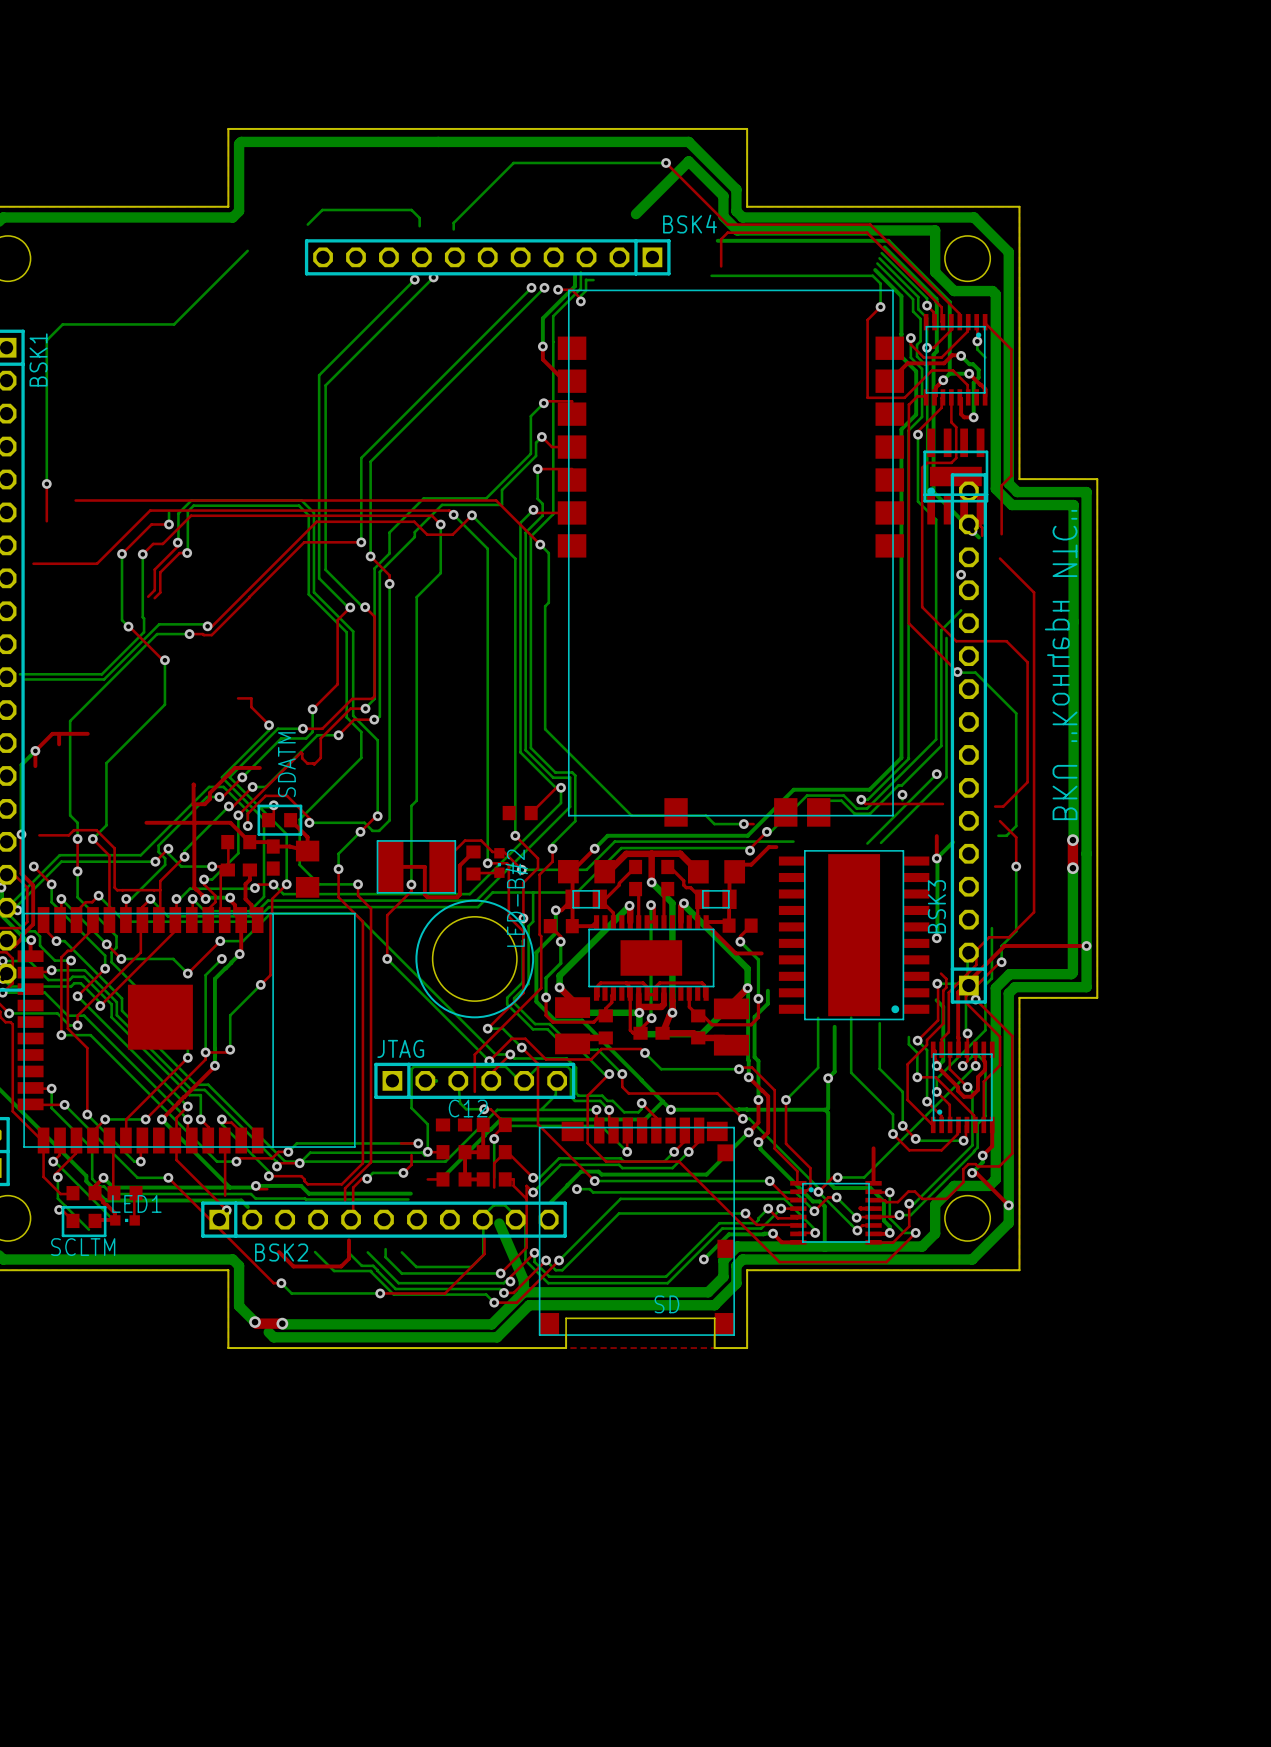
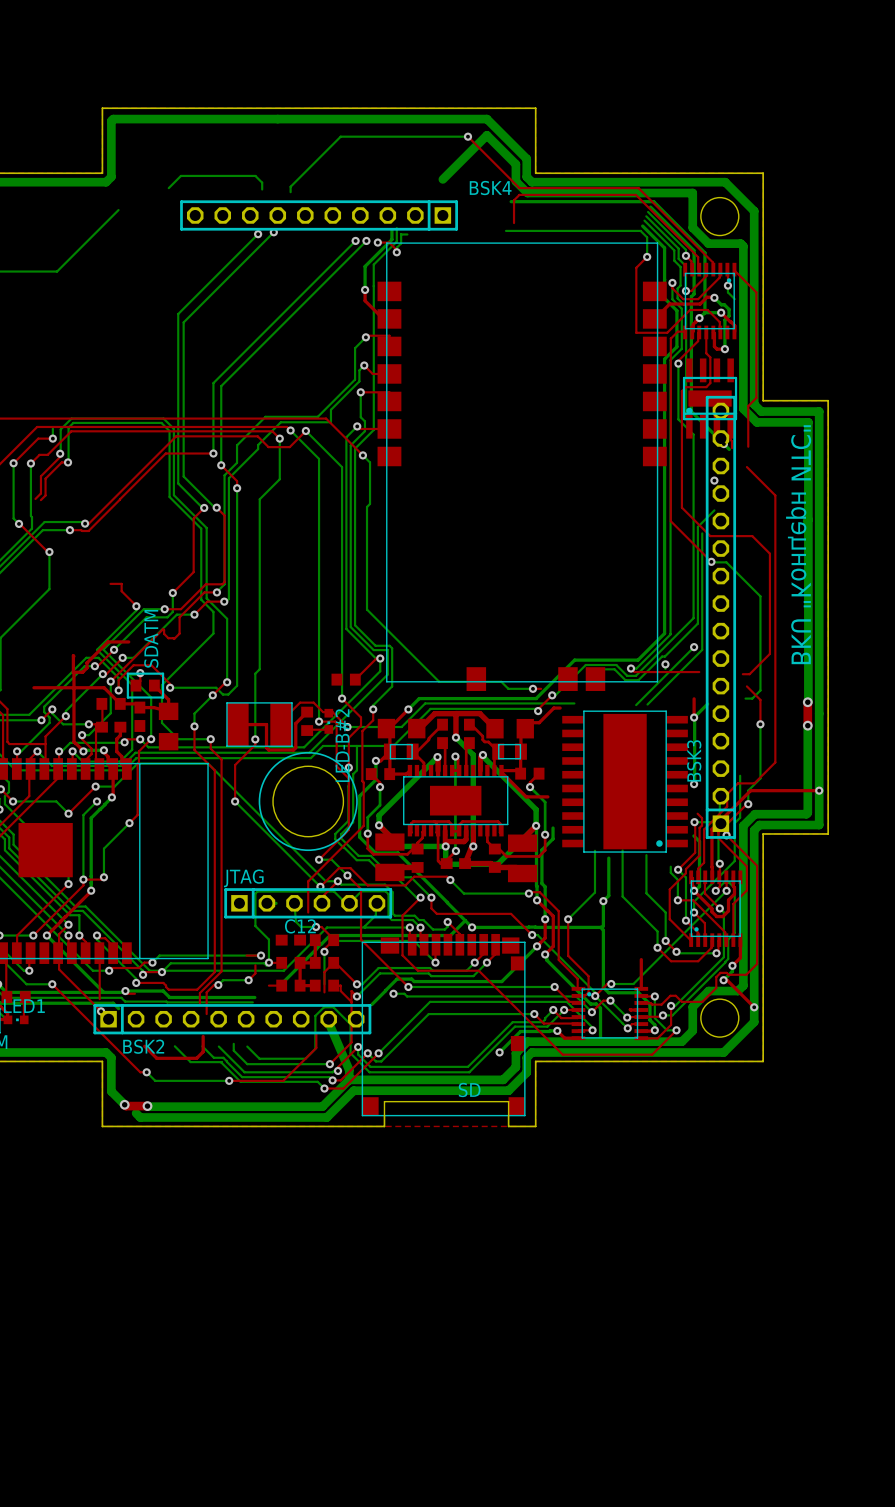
BSK4 footprint: [304, 239, 671, 276] -> [180, 200, 458, 231]
BSK2 footprint: [201, 1201, 567, 1238] -> [93, 1004, 372, 1035]

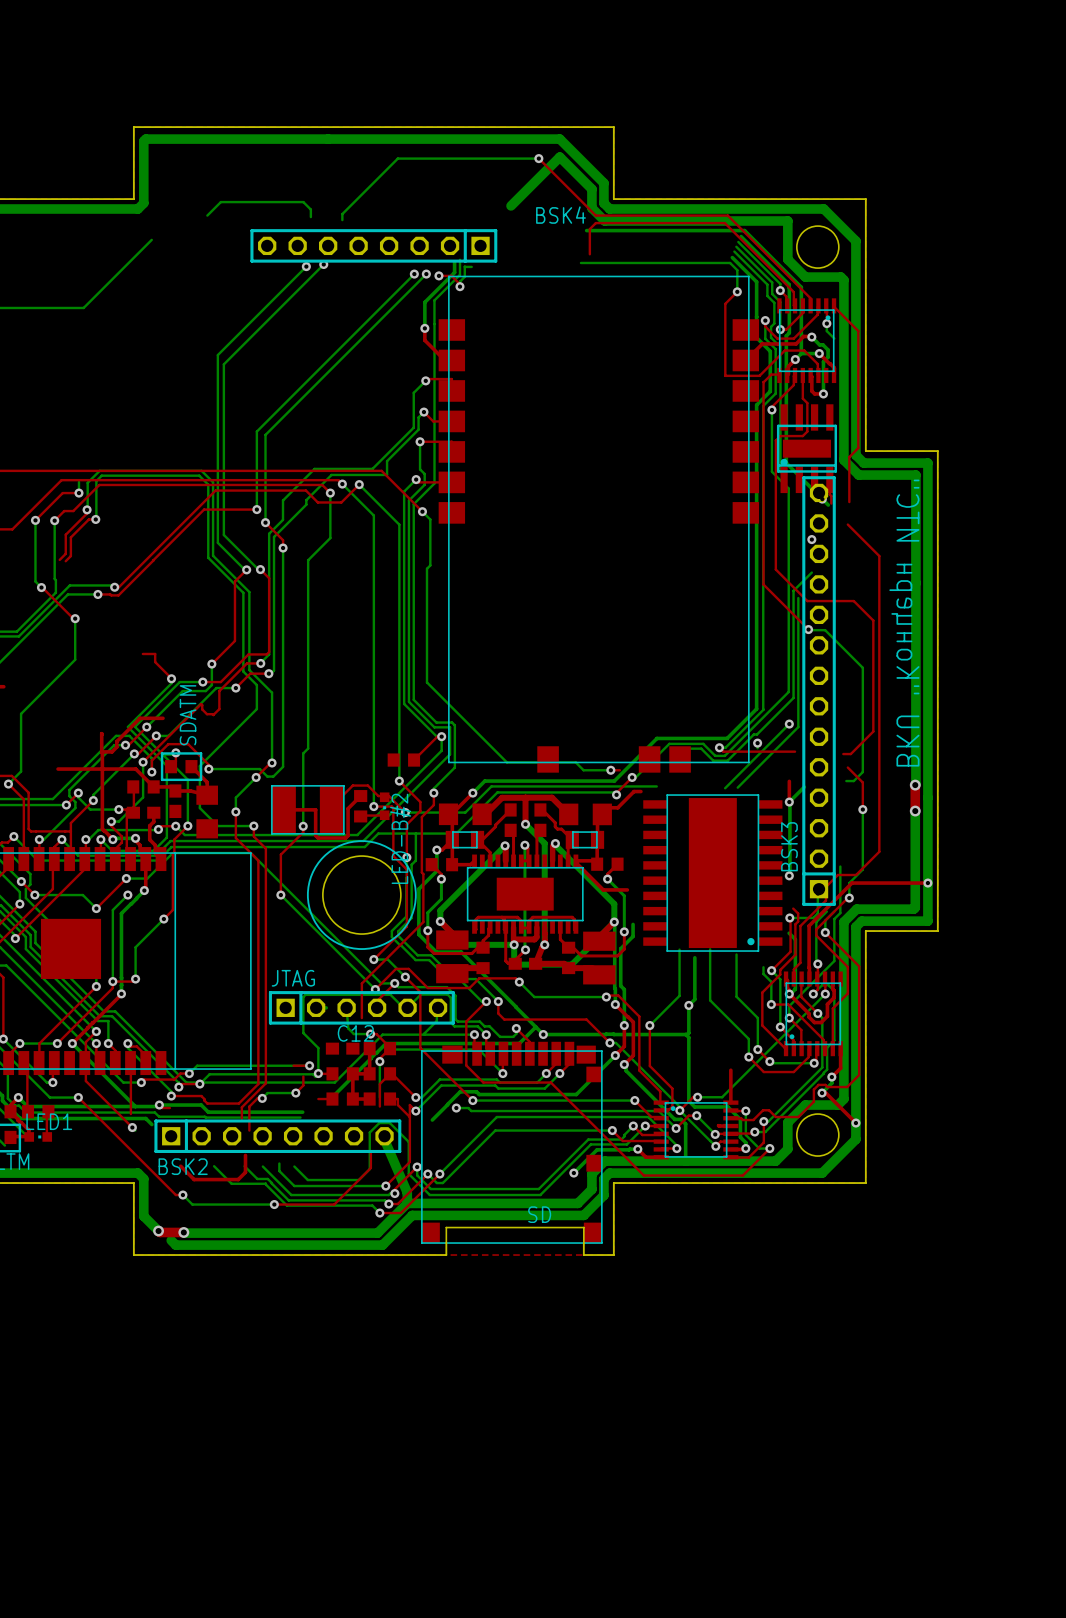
BSK4 footprint: [180, 200, 458, 231] -> [250, 229, 498, 263]
BSK3 footprint: [705, 395, 737, 839] -> [802, 476, 836, 906]
BSK2 footprint: [93, 1004, 372, 1035] -> [154, 1119, 402, 1153]

